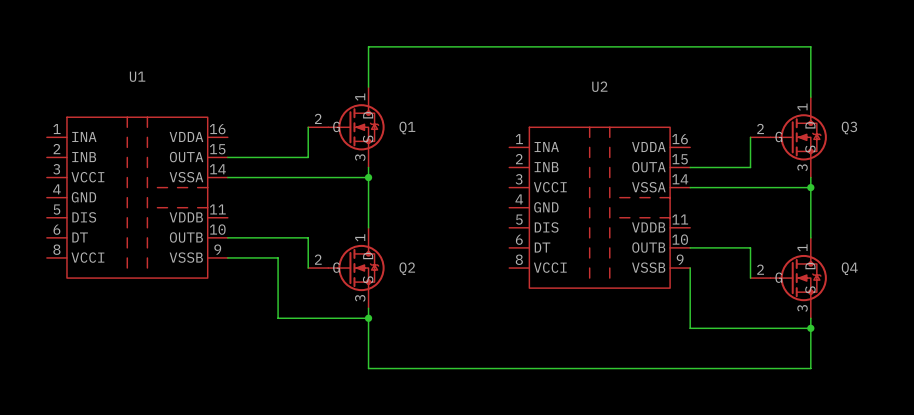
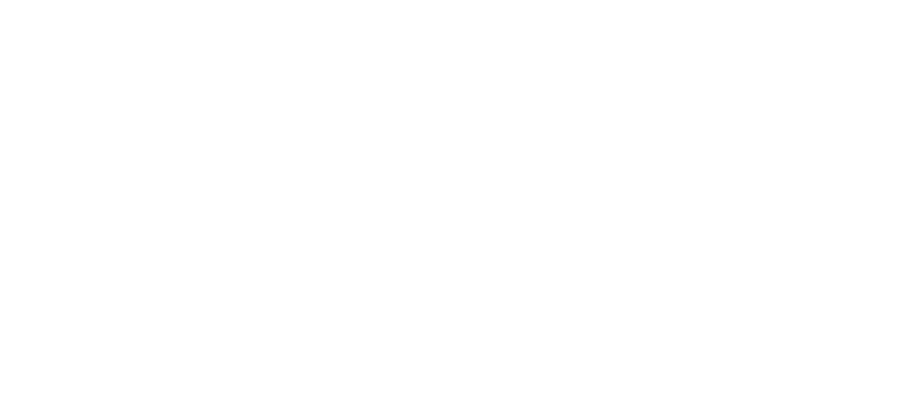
wire: (368, 87) (368, 46) (810, 46) (810, 97) -> none
wire: (308, 127) (308, 157) (227, 157) -> none
Q1: (346, 127) -> none
wire: (750, 137) (750, 167) (690, 167) -> none
Q3: (788, 137) -> none
wire: (368, 167) (368, 227) -> none
wire: (227, 177) (368, 177) -> none
junction: (368, 177) -> none
wire: (810, 177) (810, 237) -> none
wire: (690, 187) (810, 187) -> none
junction: (810, 187) -> none
U1: (137, 197) -> none
U2: (599, 207) -> none
wire: (227, 237) (308, 237) (308, 268) -> none
wire: (690, 247) (750, 247) (750, 278) -> none
wire: (227, 257) (278, 257) (278, 318) (368, 318) -> none
Q2: (346, 268) -> none
wire: (690, 268) (690, 328) (810, 328) -> none
Q4: (788, 278) -> none
wire: (368, 308) (368, 368) (810, 368) (810, 318) -> none
junction: (368, 318) -> none
junction: (810, 328) -> none

